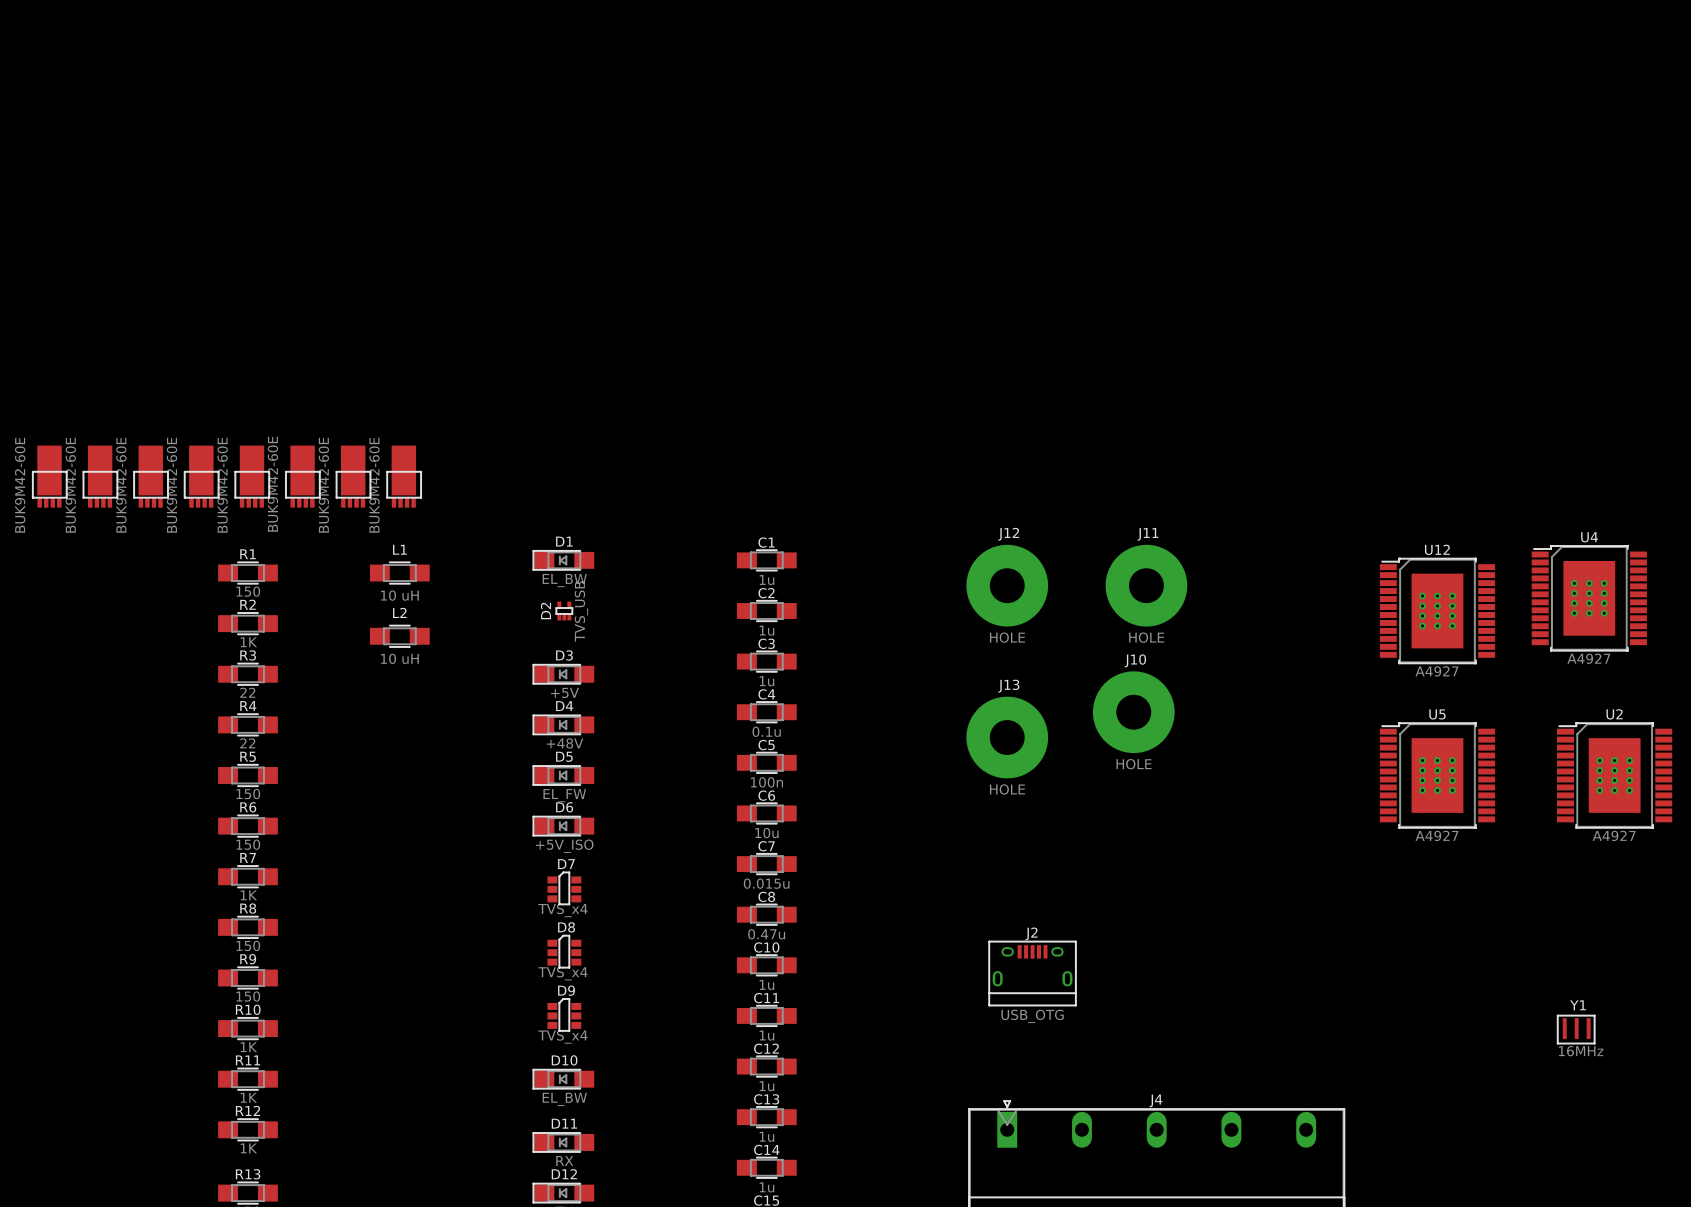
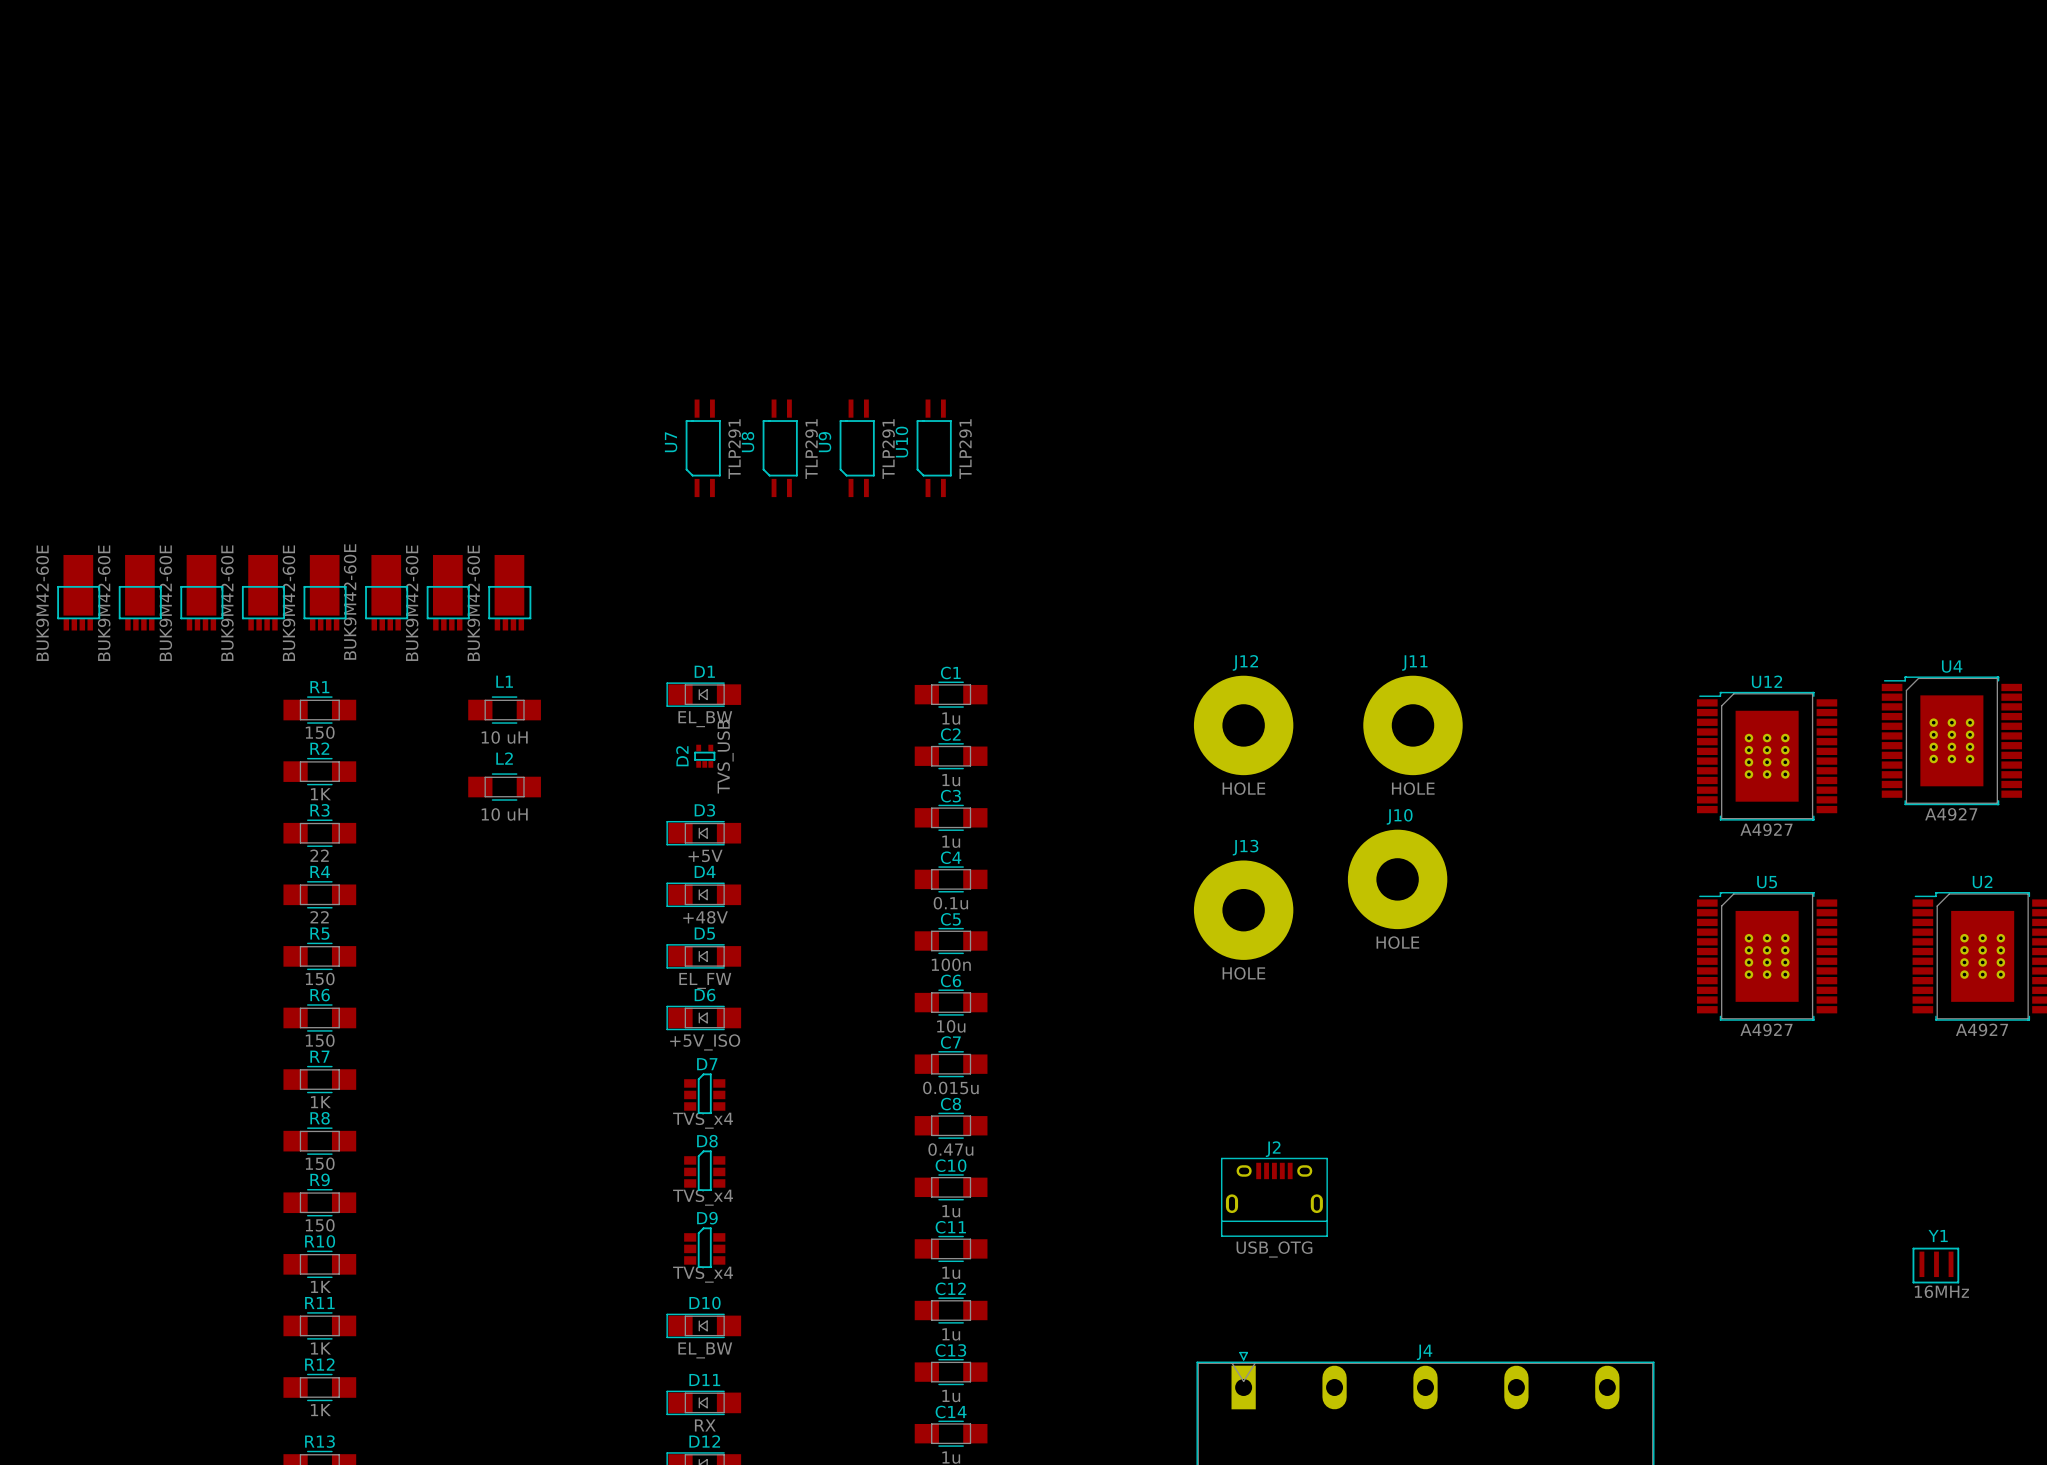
U7: none -> TLP291 (703, 448)
U8: none -> TLP291 (780, 448)
U9: none -> TLP291 (857, 448)
U10: none -> TLP291 (934, 448)

